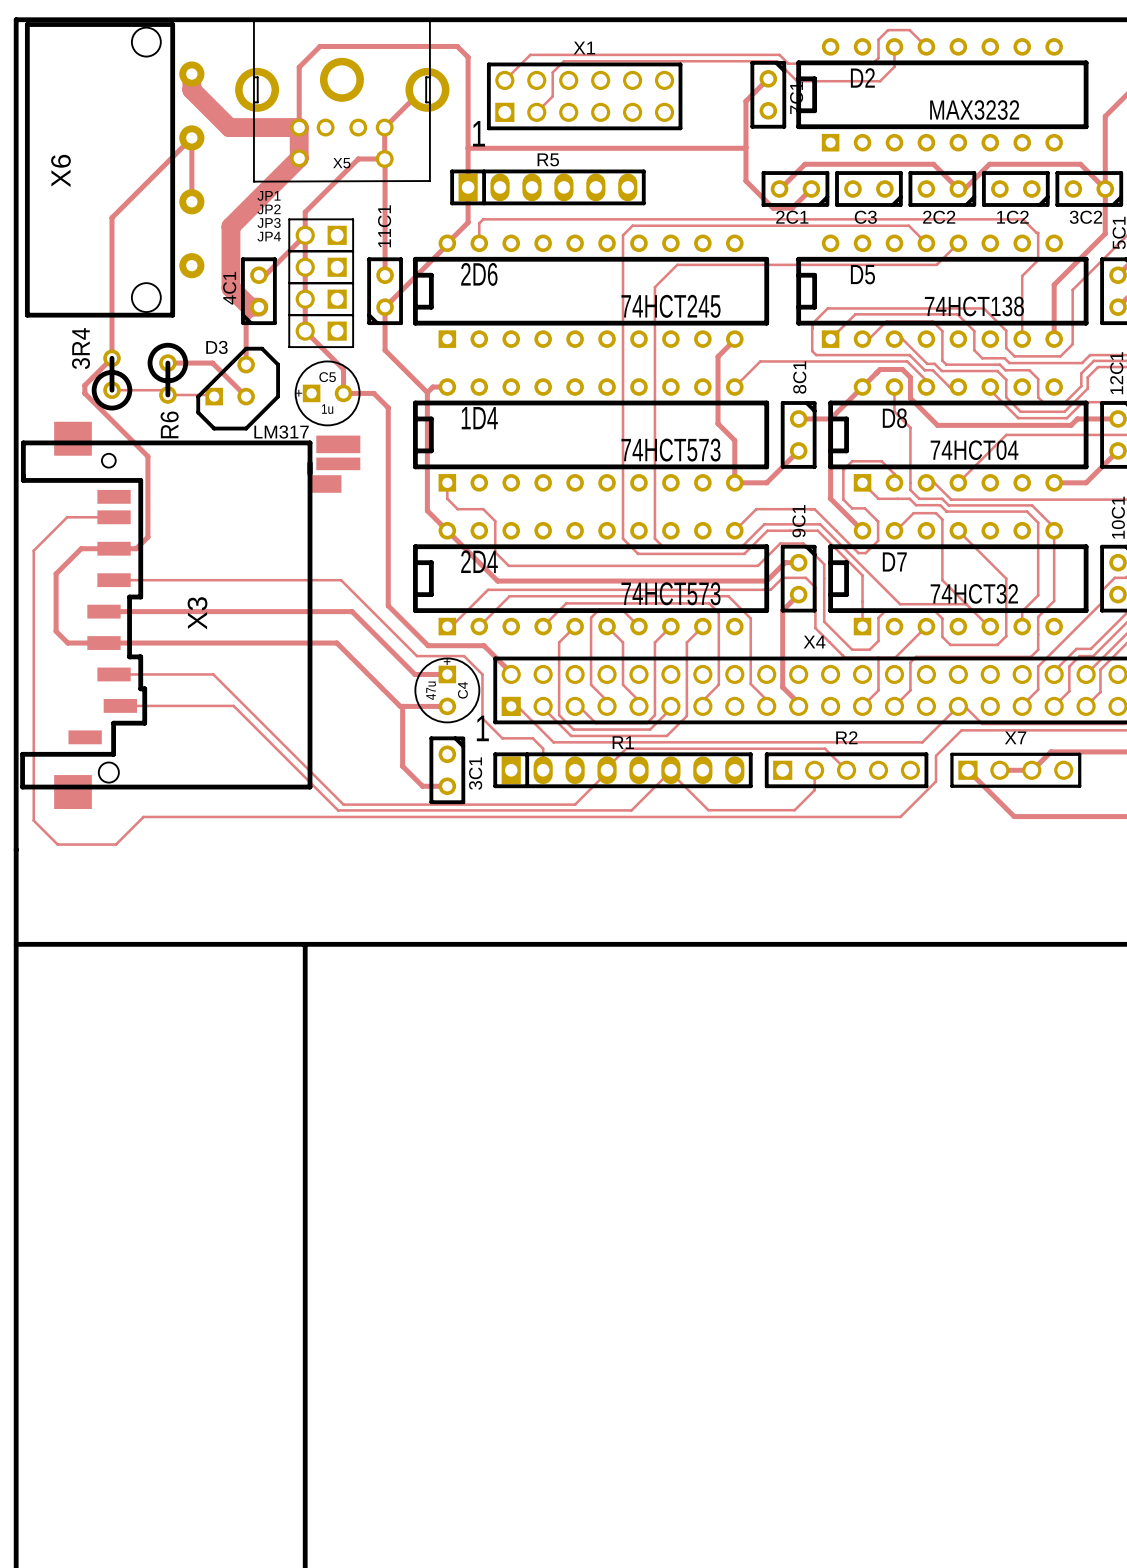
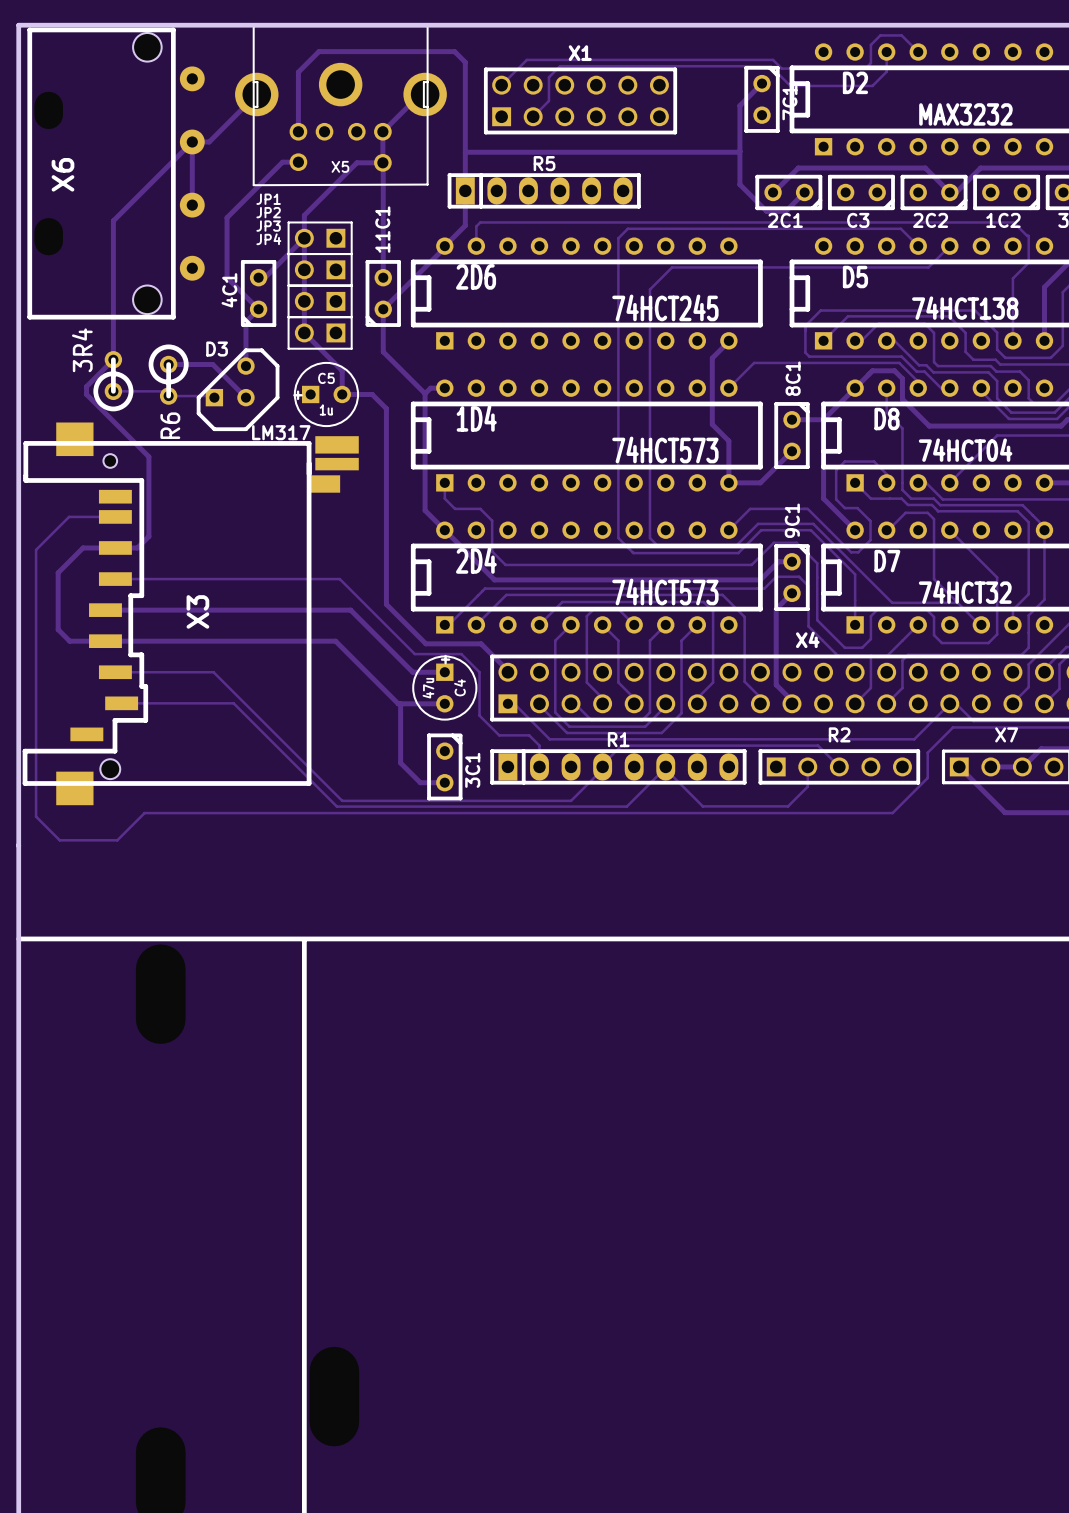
track: (191, 74) (191, 90) (229, 127) (299, 127) (299, 158) (230, 226) (230, 288) (250, 307) (258, 307) -> (298, 162) (282, 162) (227, 217) (227, 277) (258, 309)
track: none -> (256, 94) (209, 141) (192, 141)
text: 1 (479, 133) -> none
text: 1 (482, 728) -> none

